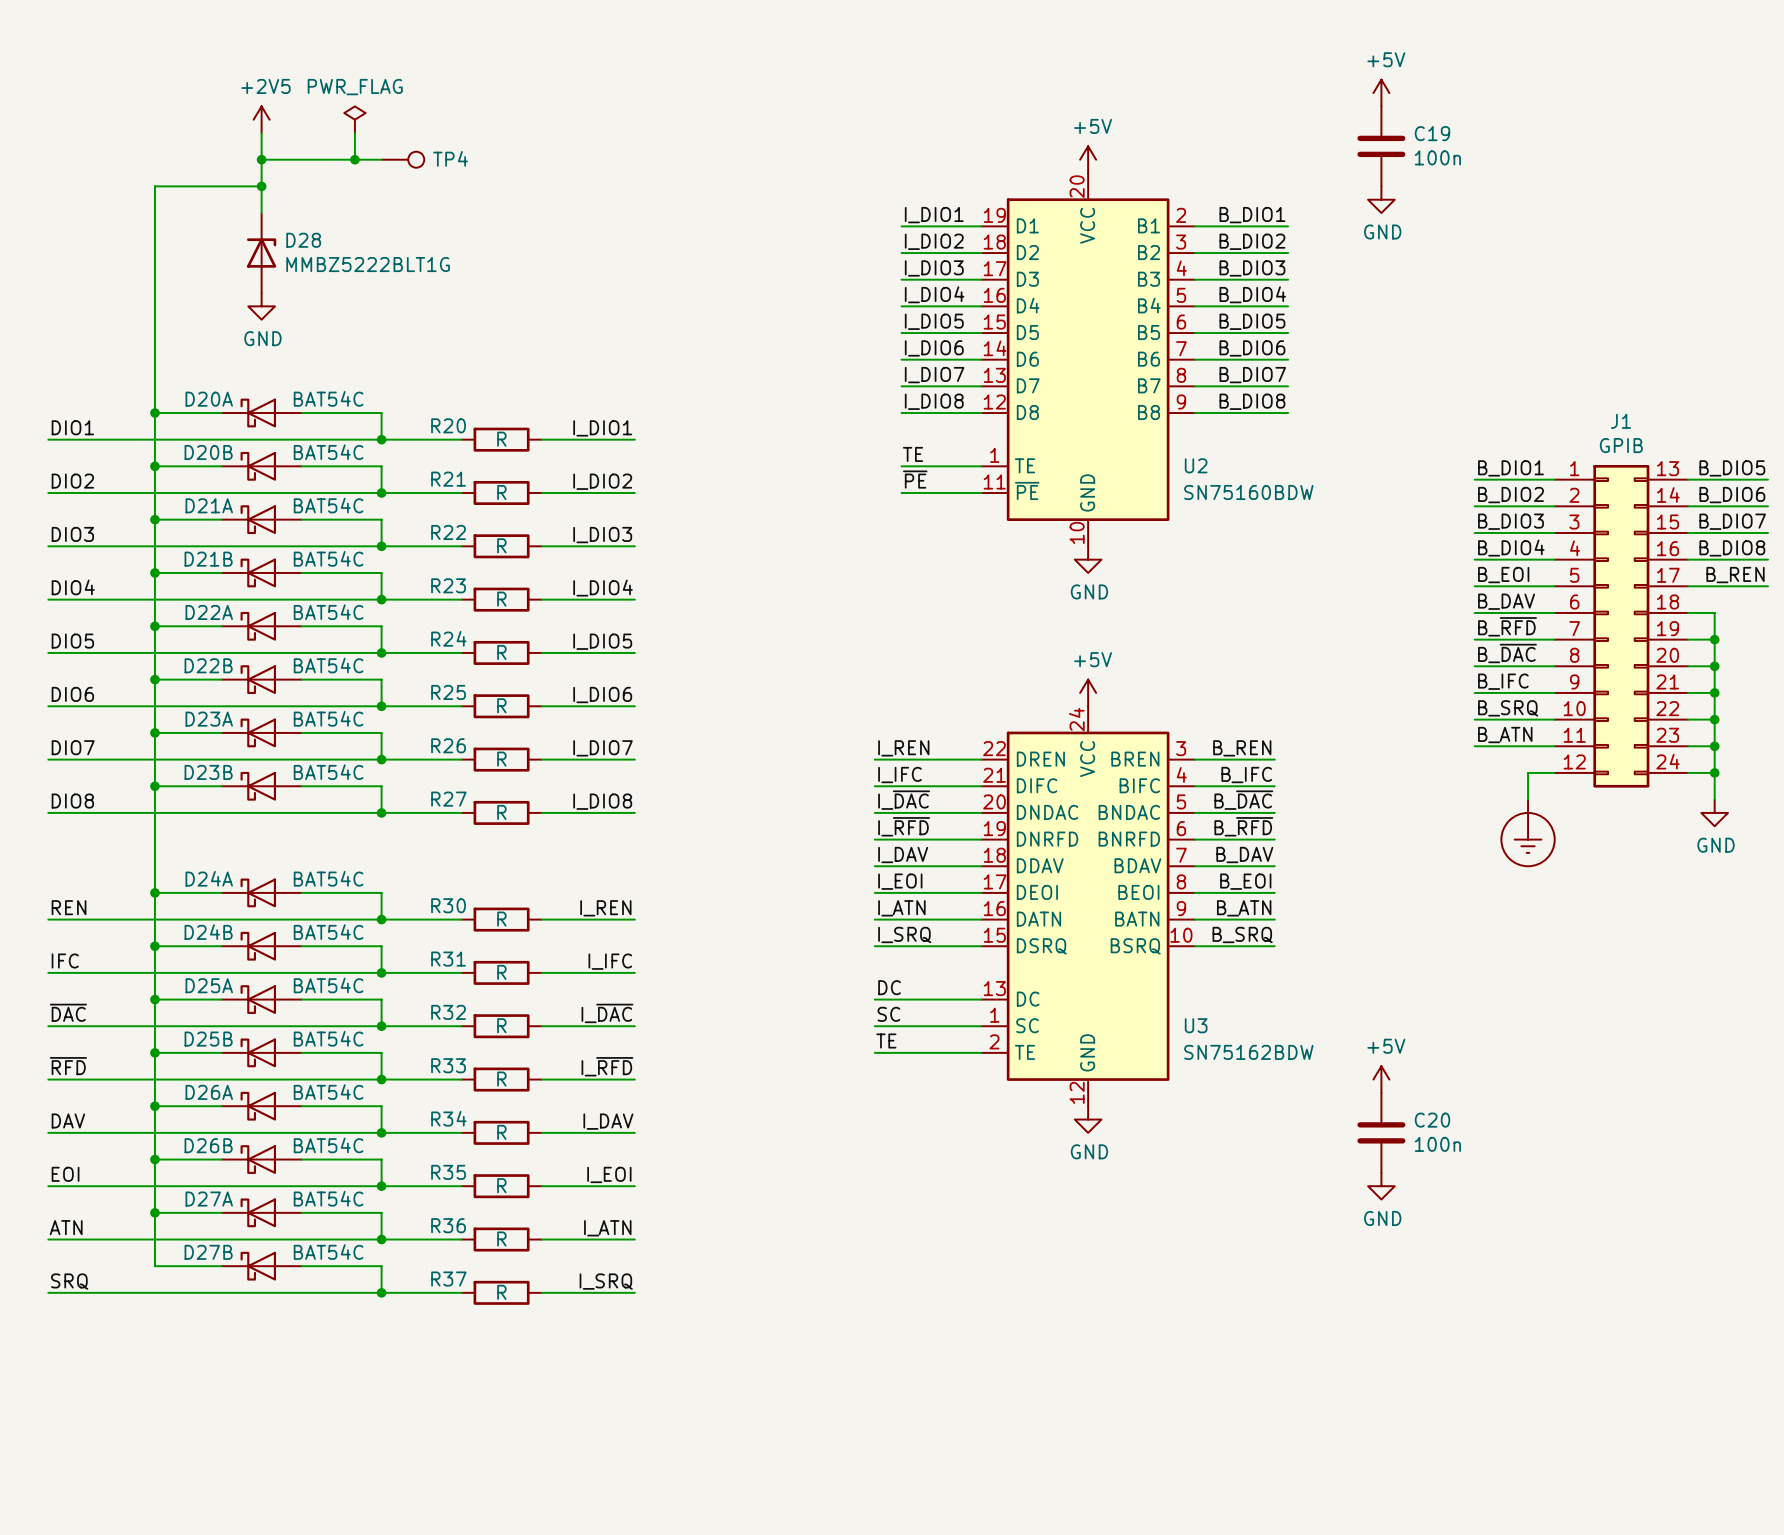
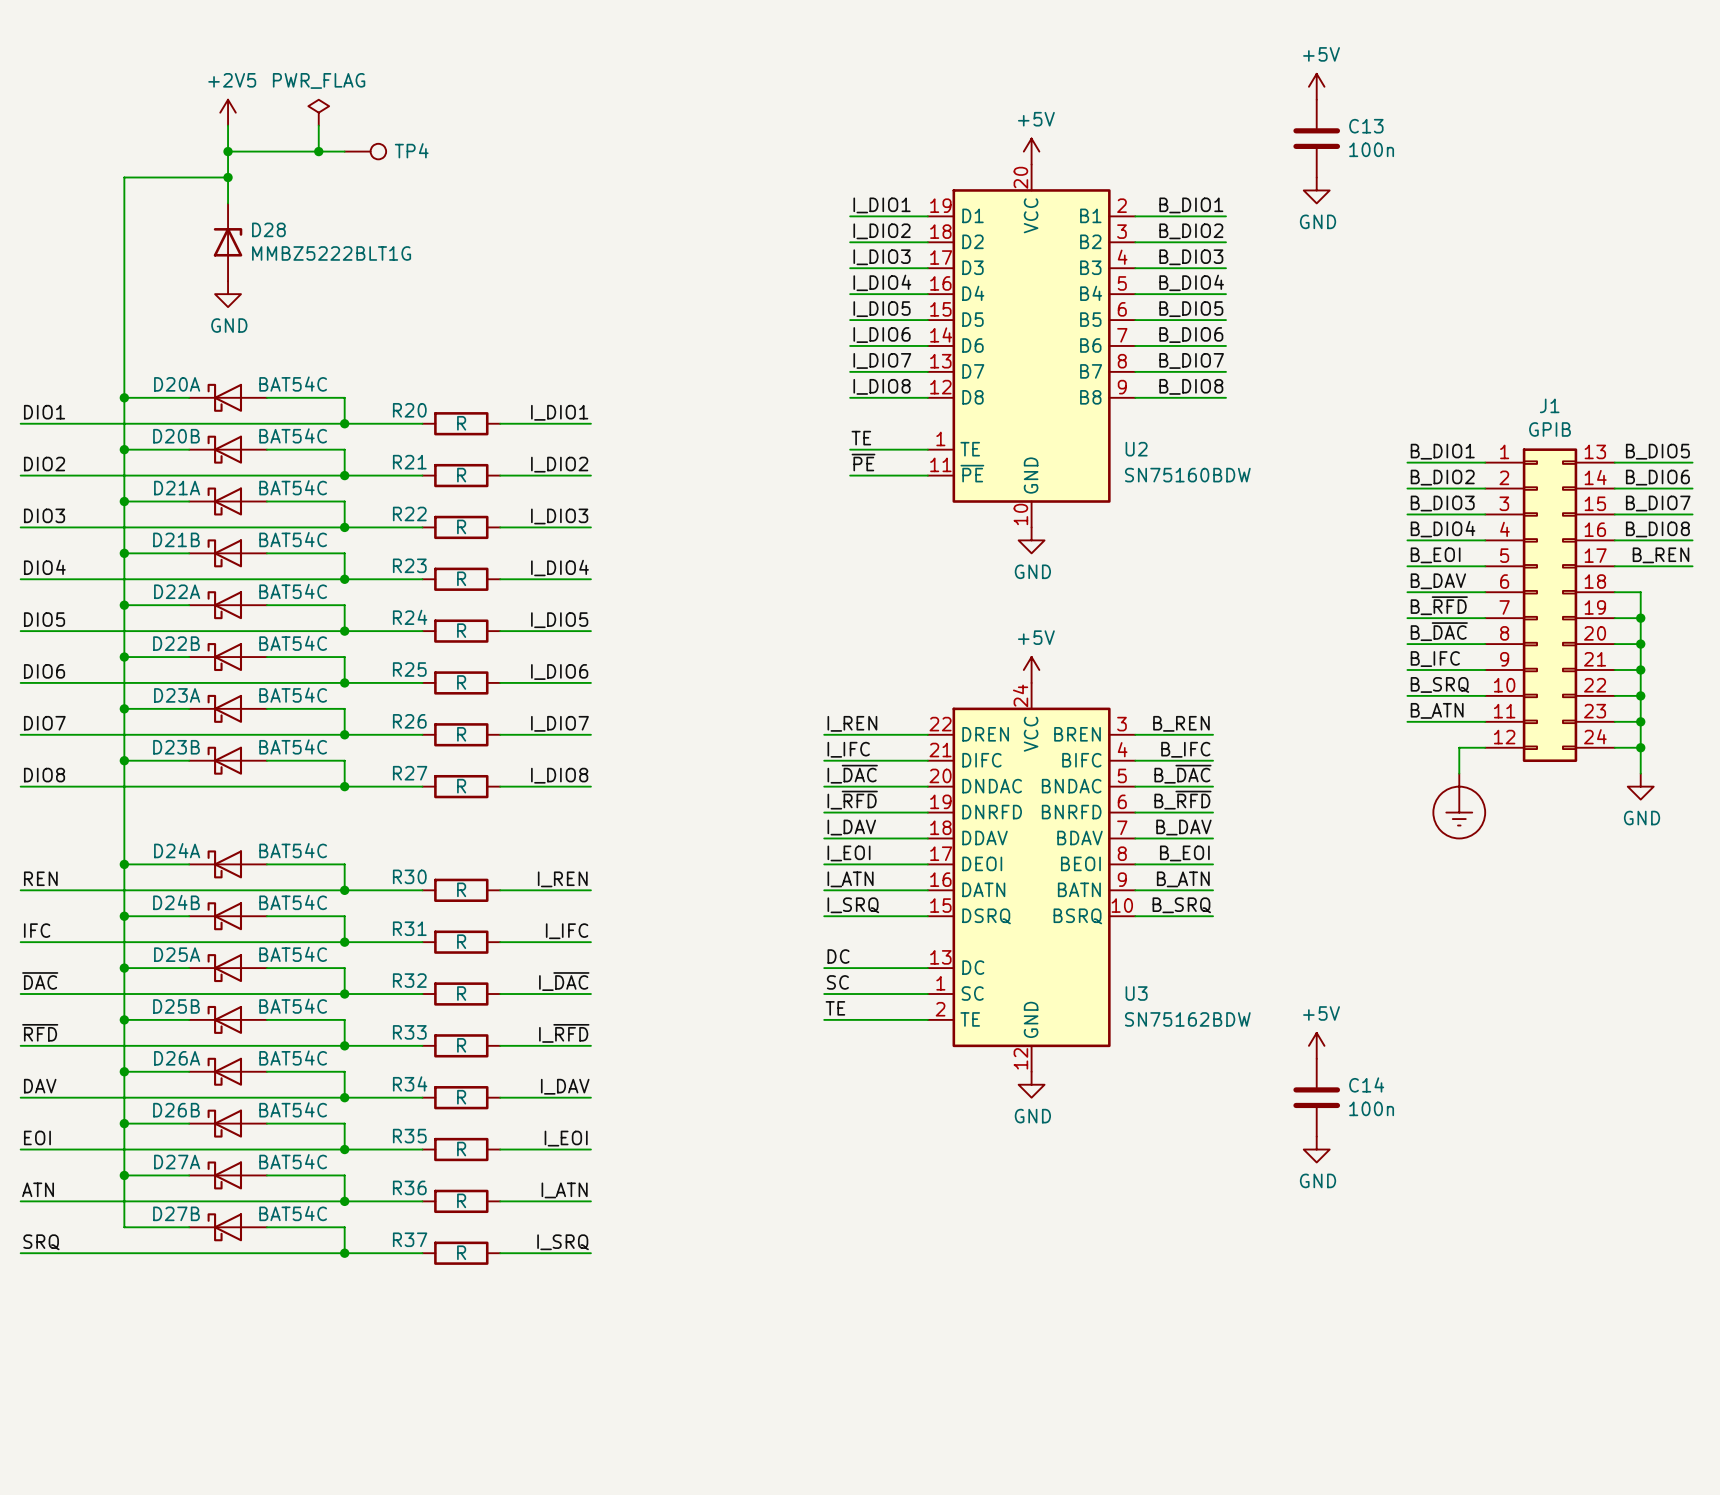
C19 name: C19 (1432, 133) -> C13 (1366, 126)
C20 name: C20 (1432, 1120) -> C14 (1366, 1084)

